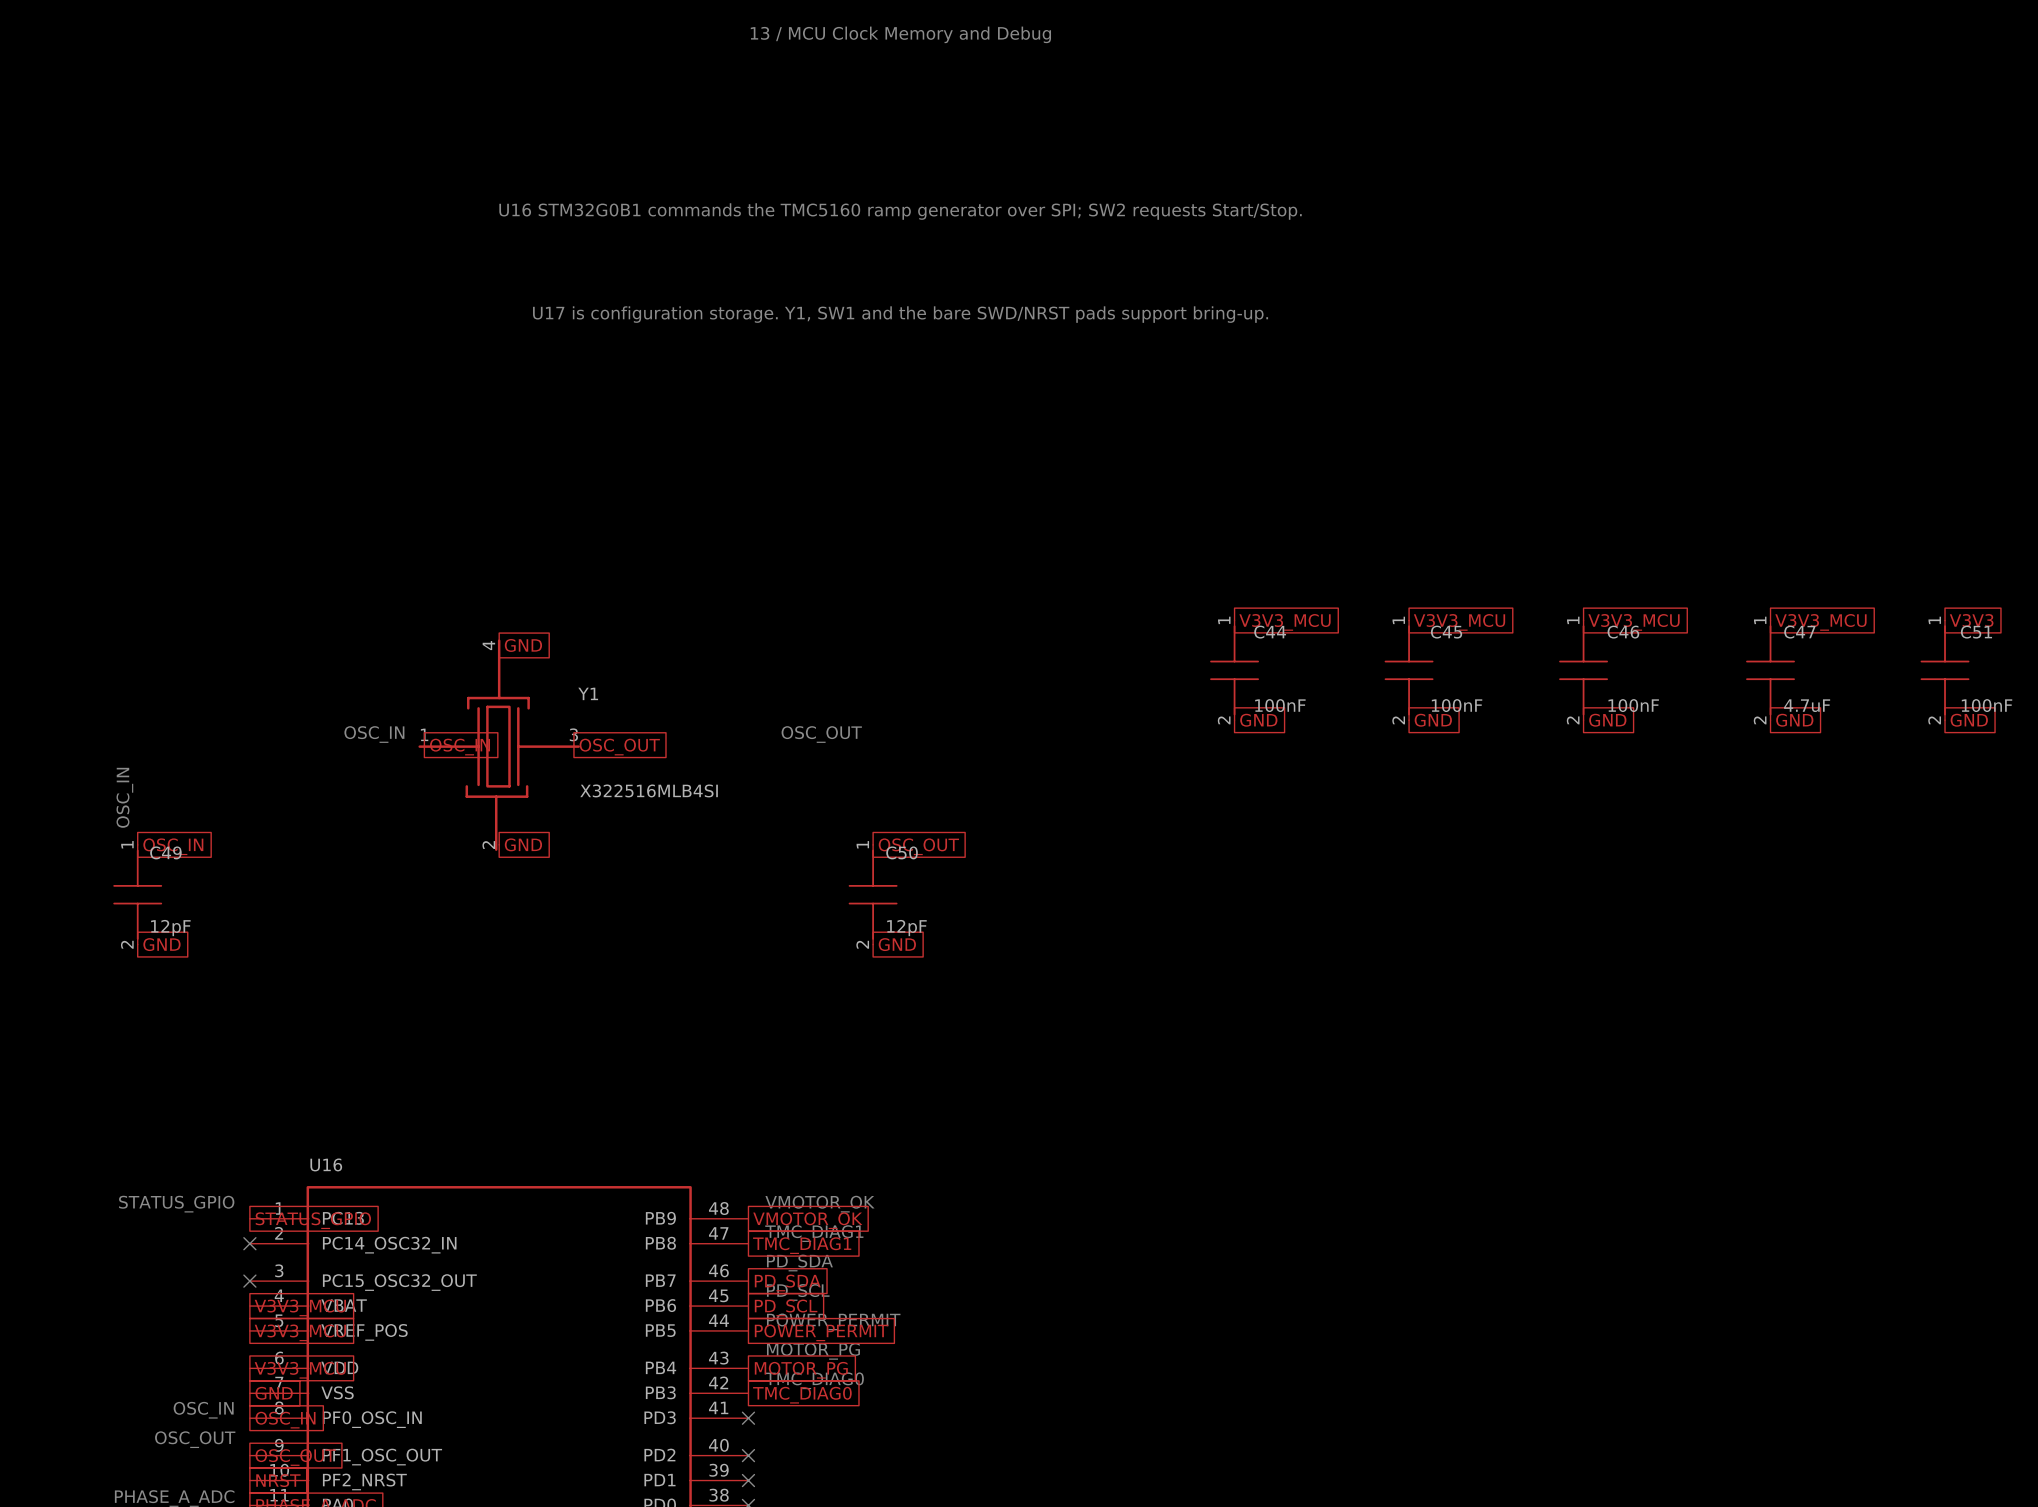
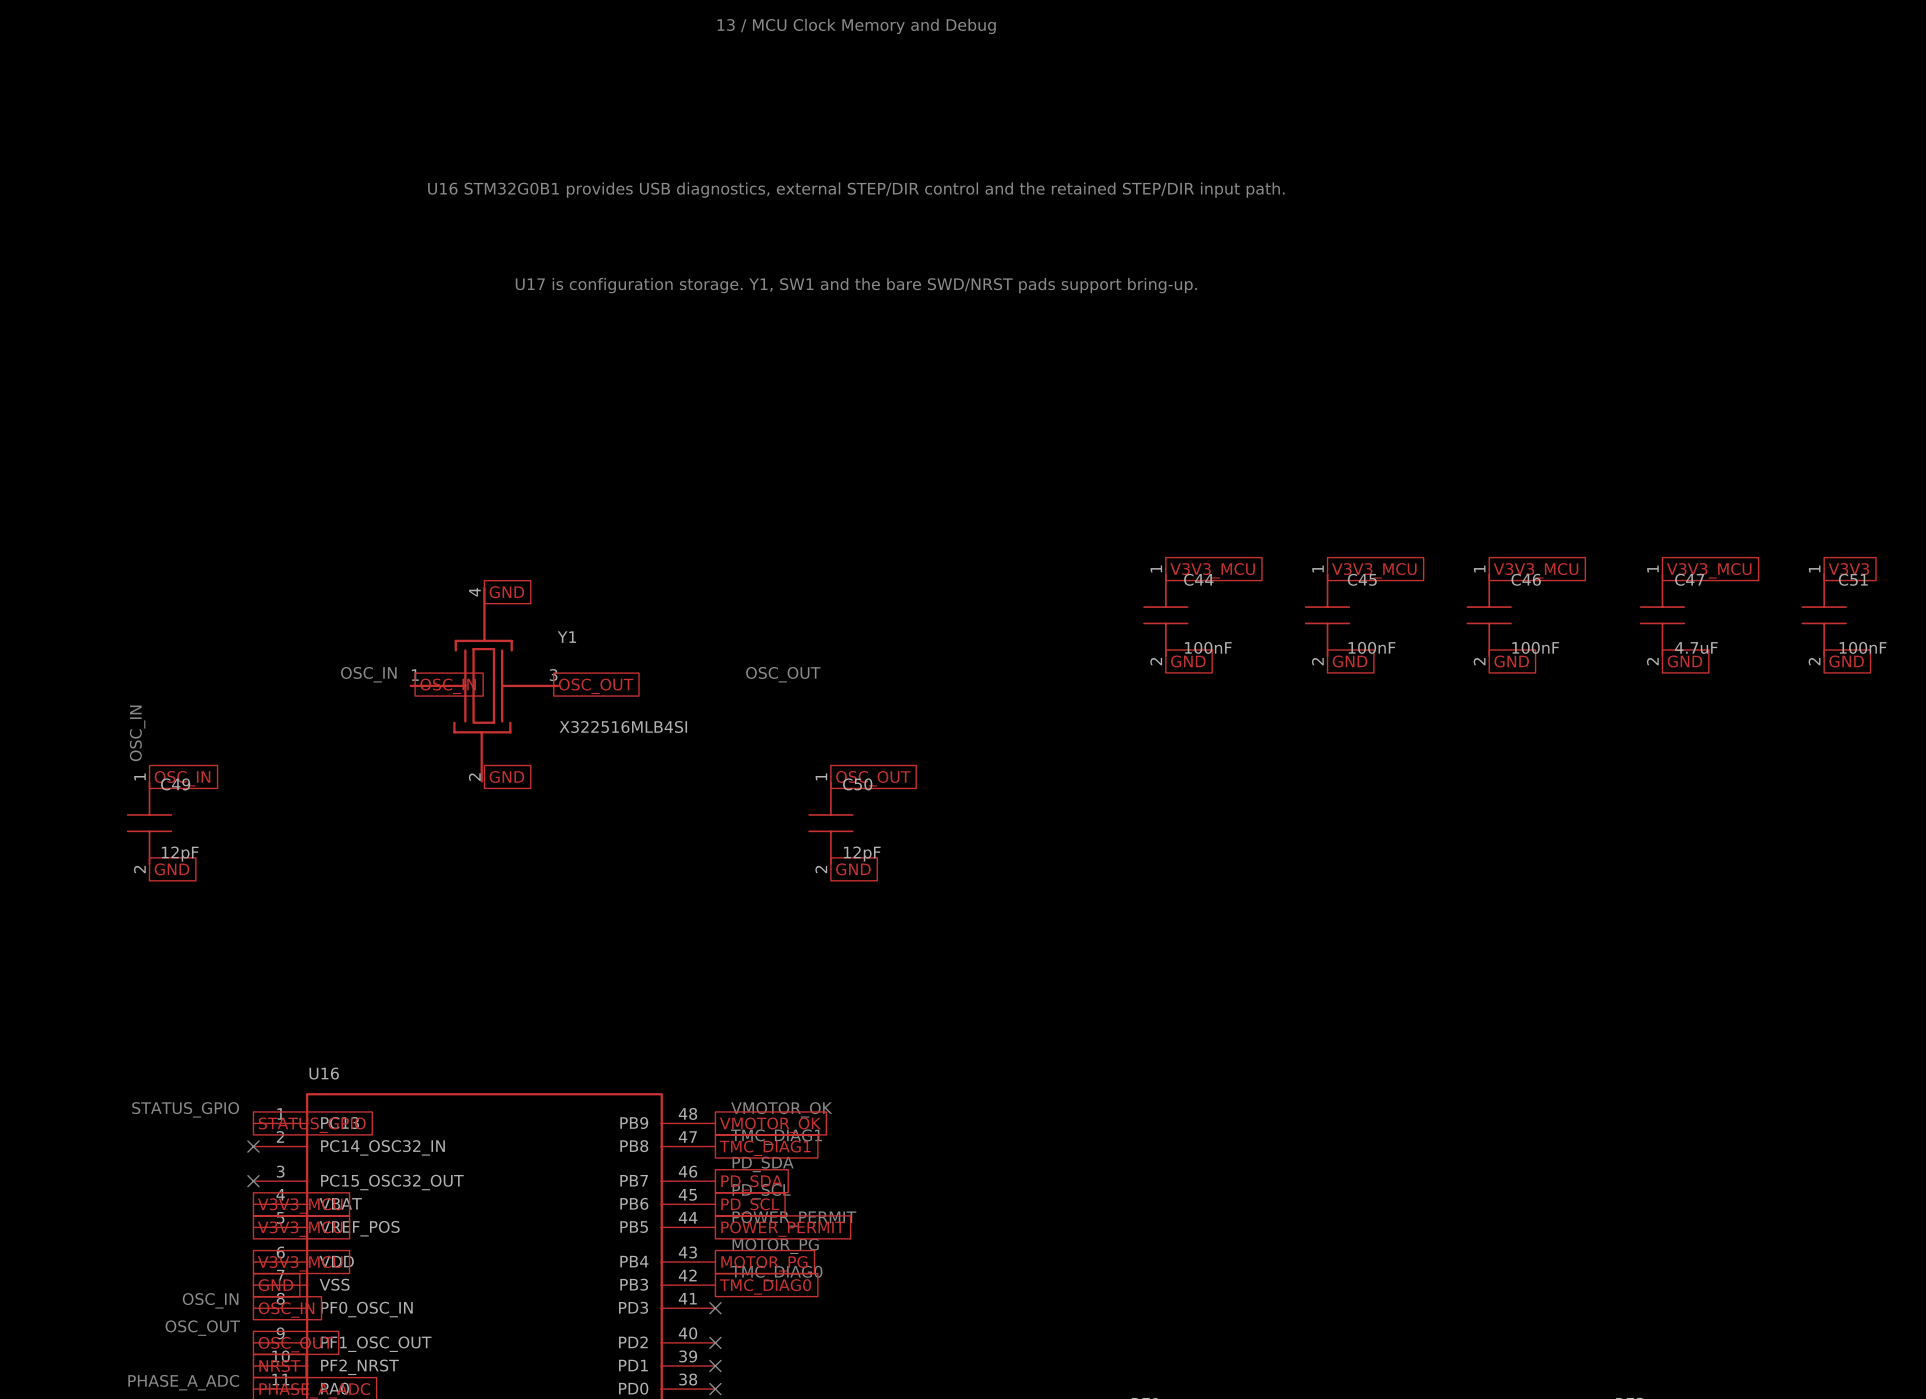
text: U16 STM32G0B1 commands the TMC5160 ramp generator over SPI; SW2 requests Start/Stop. (900, 211) -> U16 STM32G0B1 provides USB diagnostics, external STEP/DIR control and the retained STEP/DIR input path. (856, 190)

